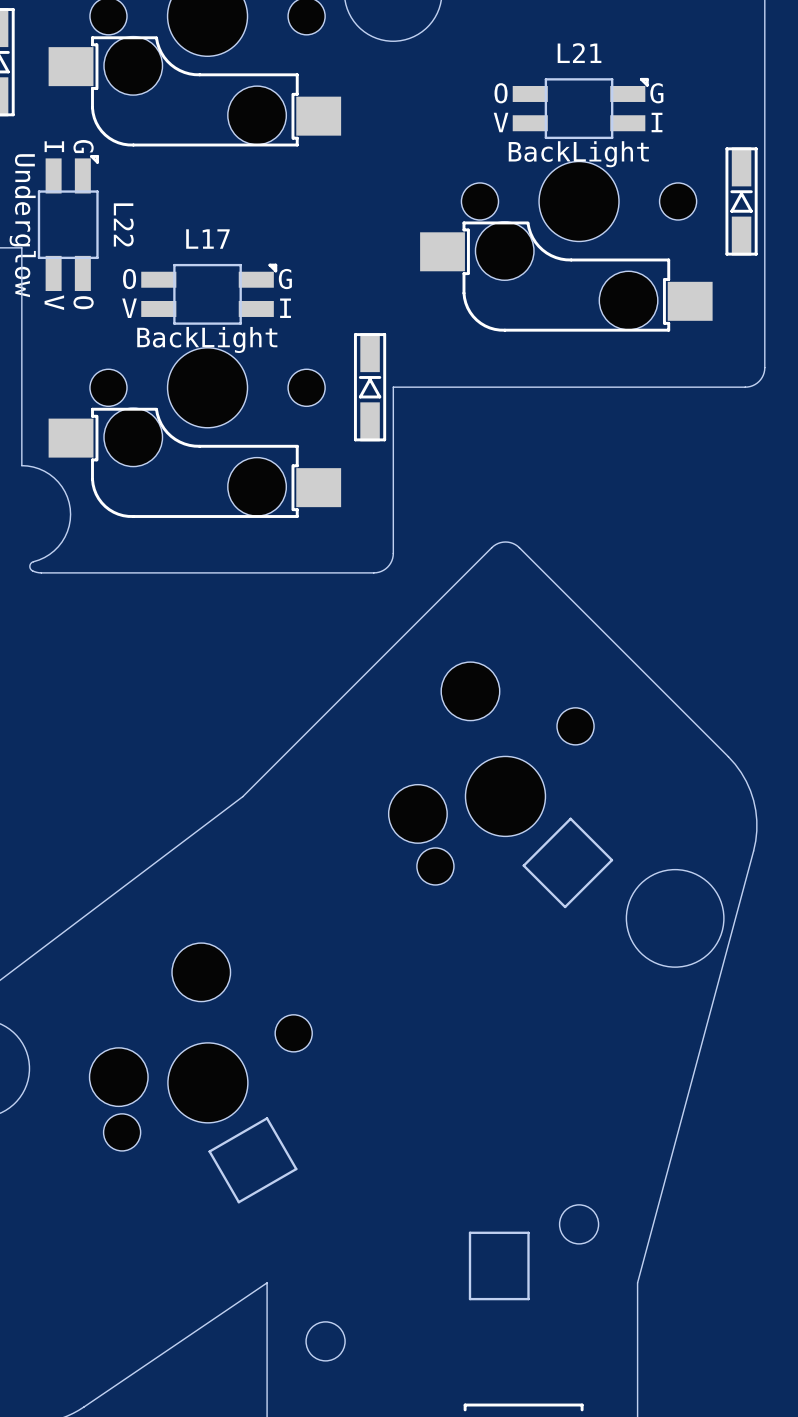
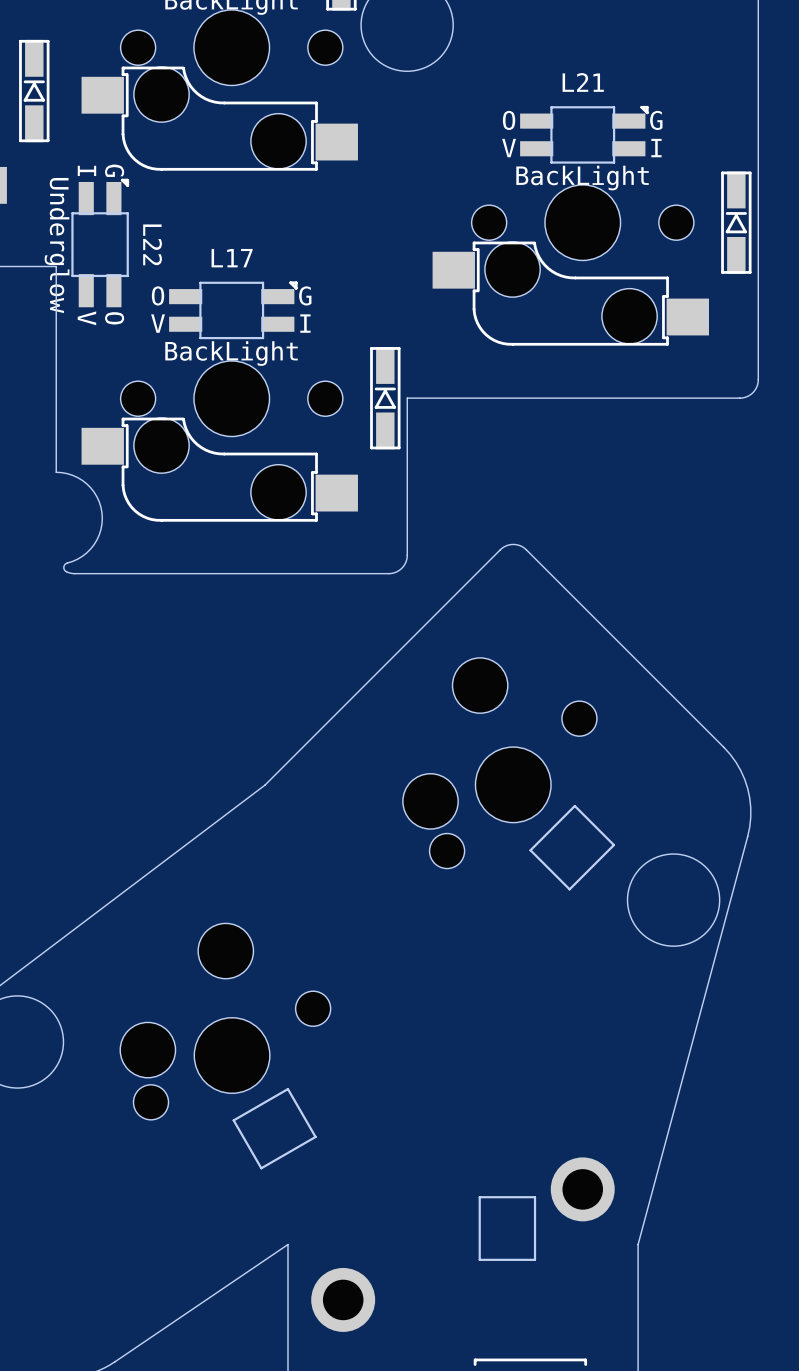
round board edge: [559, 1204, 600, 1245] -> none
part: none -> (582, 1189)
round board edge: [305, 1321, 346, 1362] -> none
part: none -> (343, 1299)

